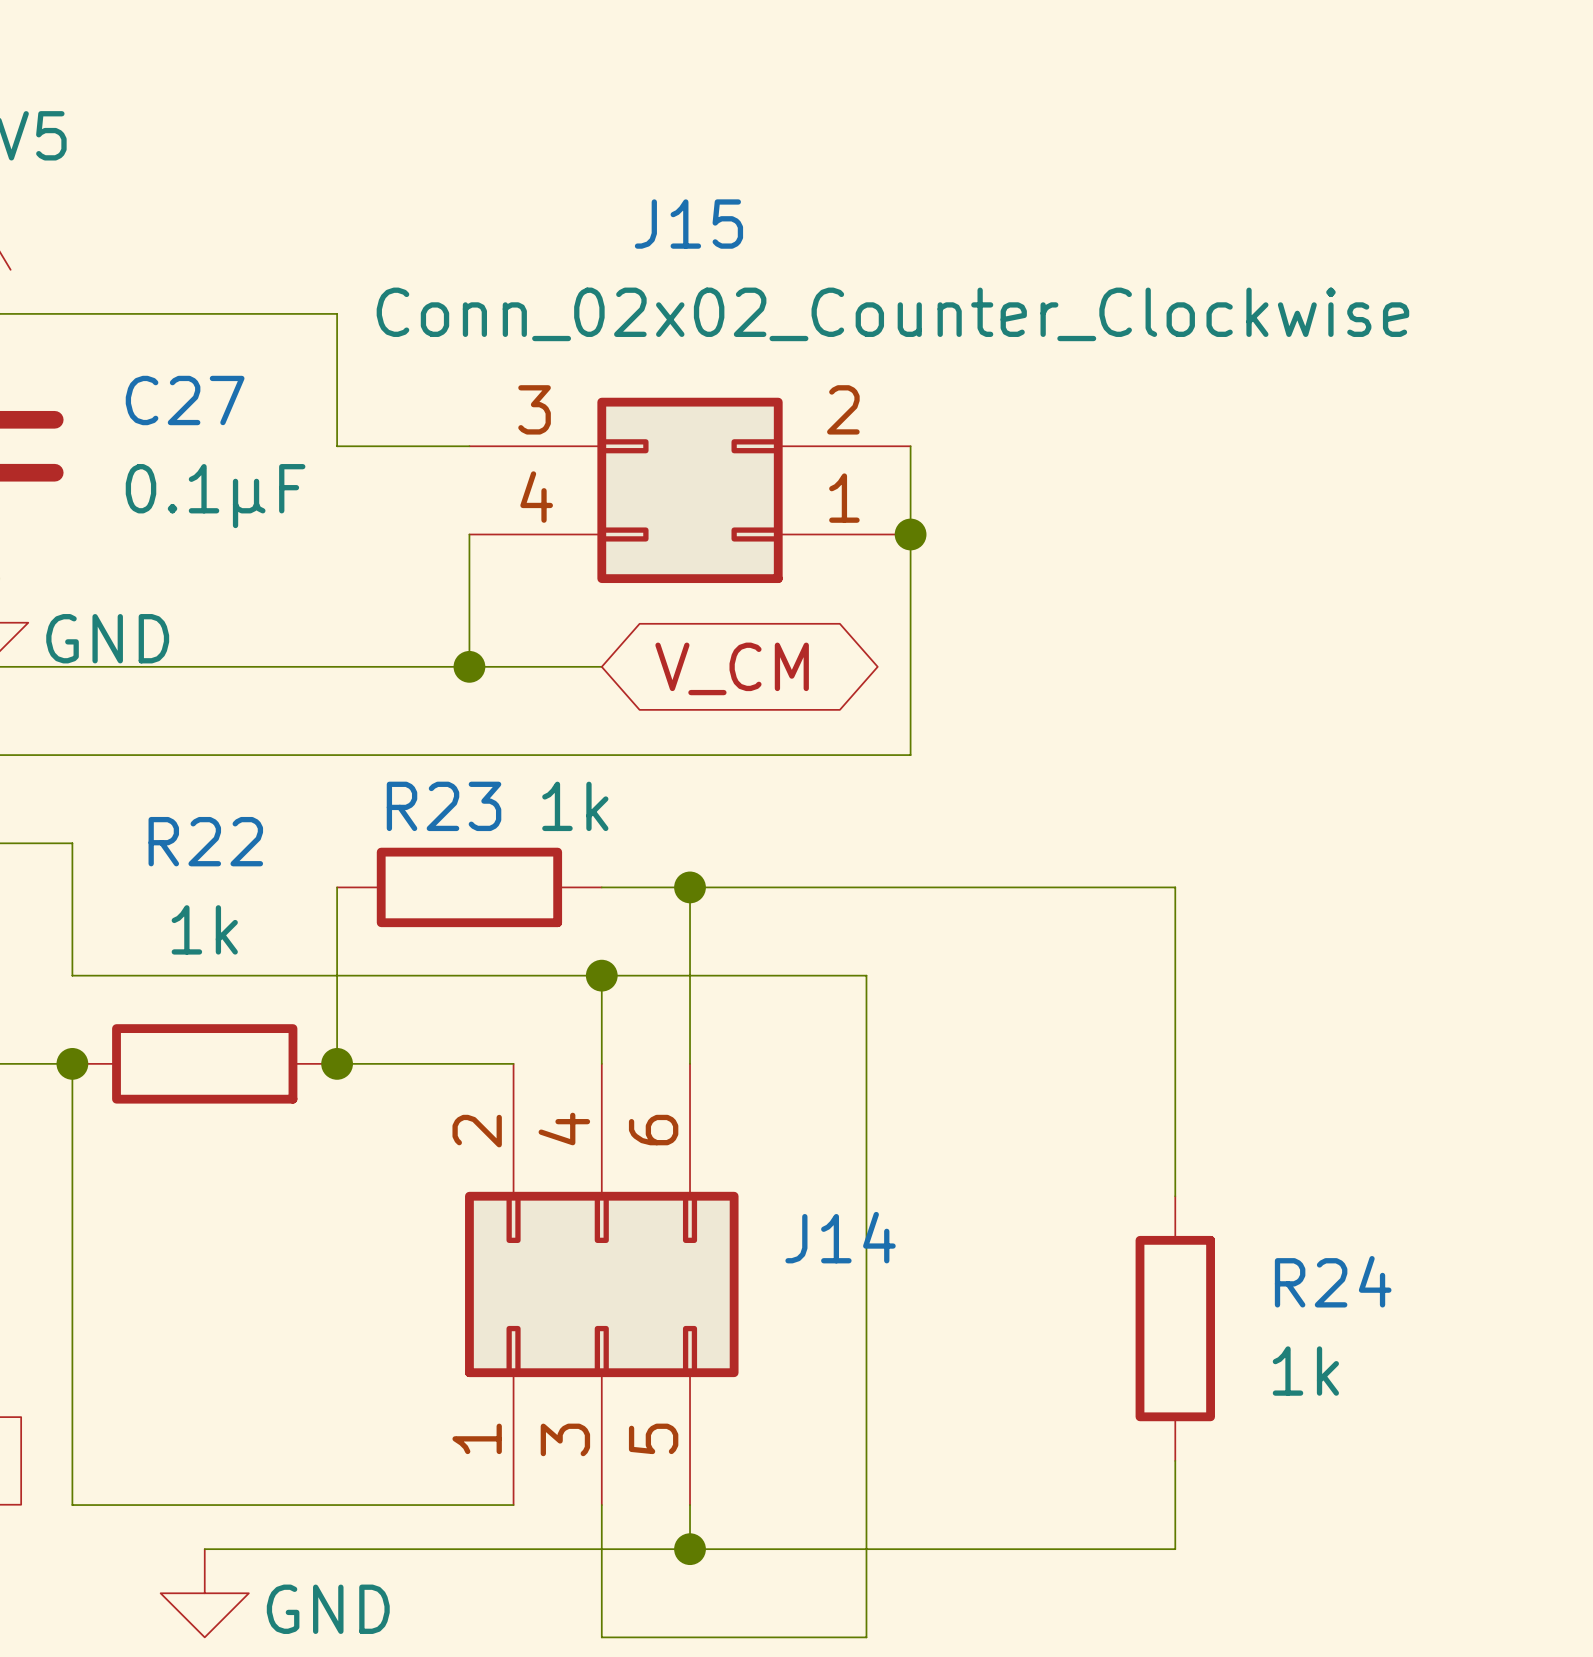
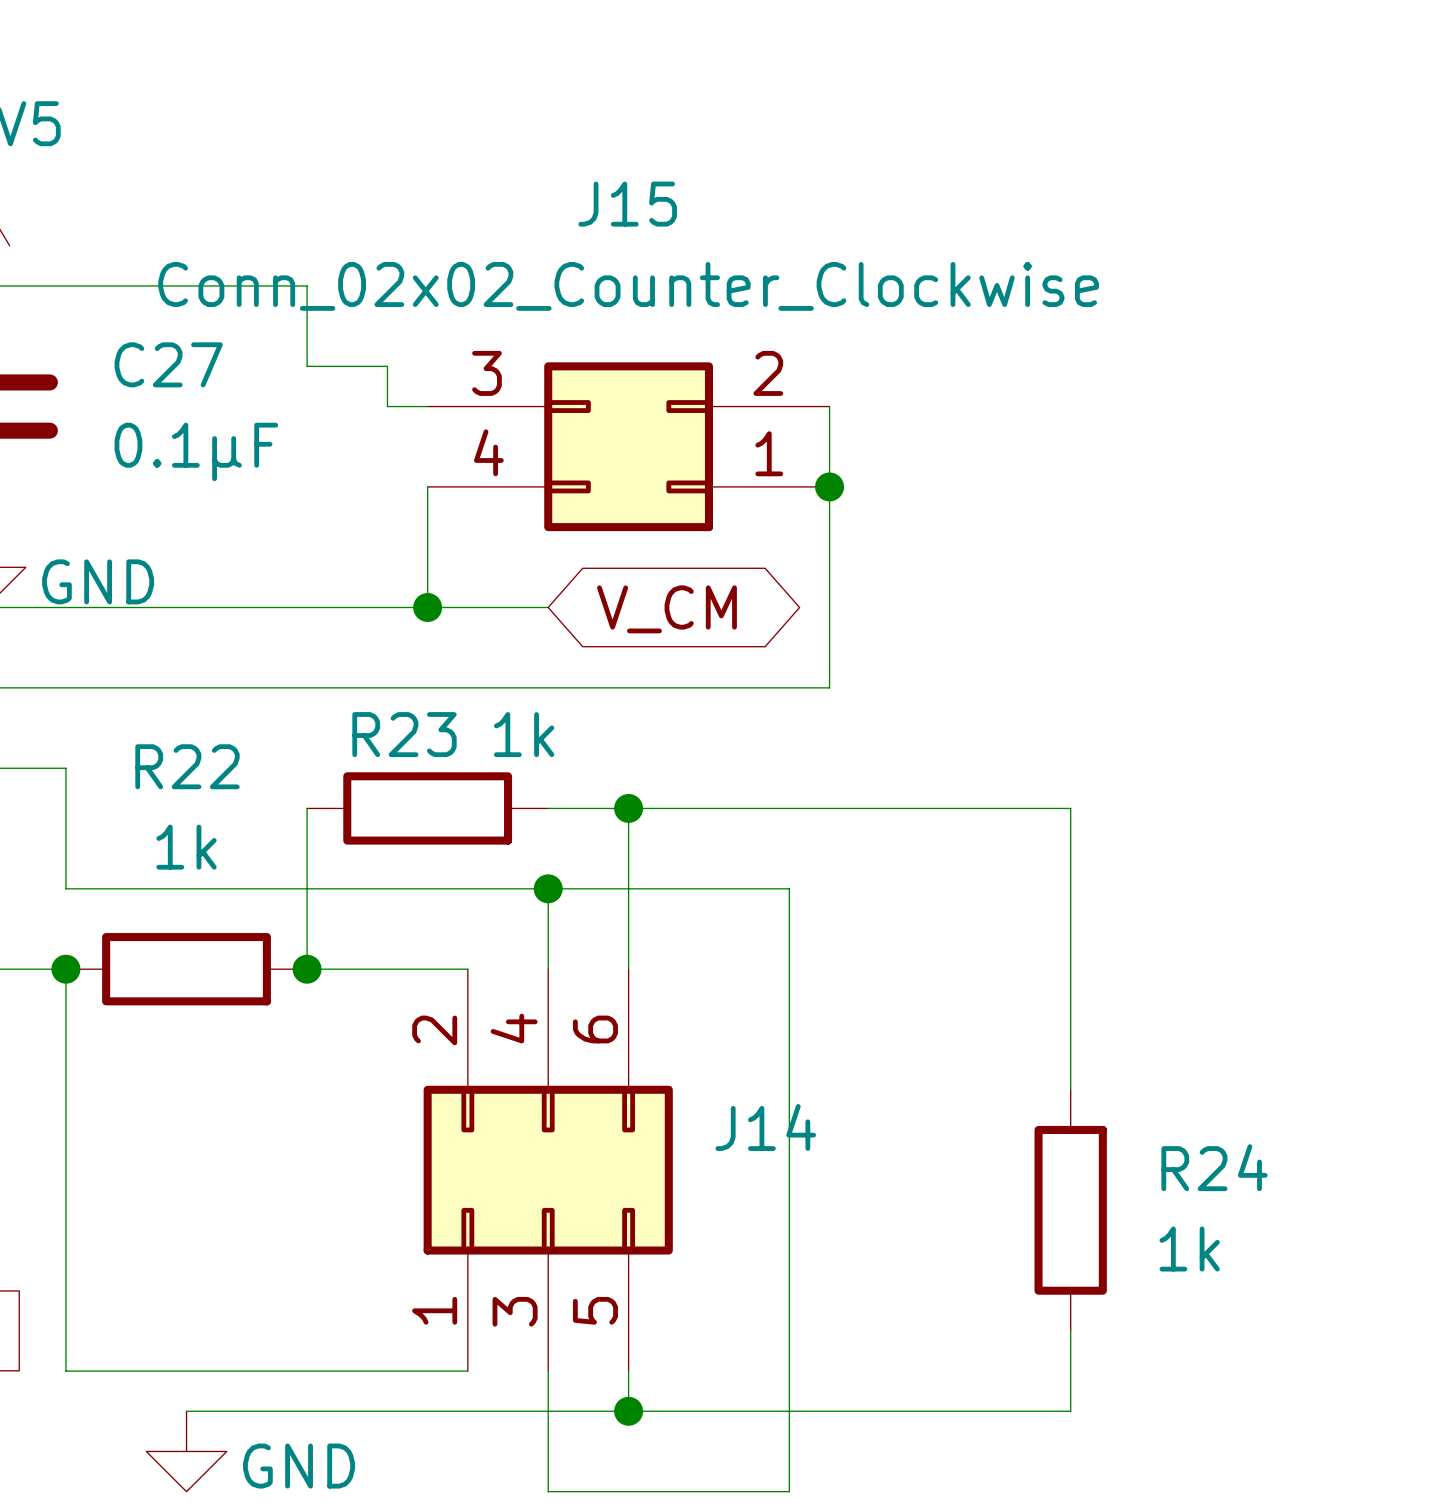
J15 value position: Conn_02x02_Counter_Clockwise (892, 314) -> Conn_02x02_Counter_Clockwise (628, 286)
wire: (337, 402) (337, 446) (425, 446) -> (307, 366) (387, 366) (387, 406)

